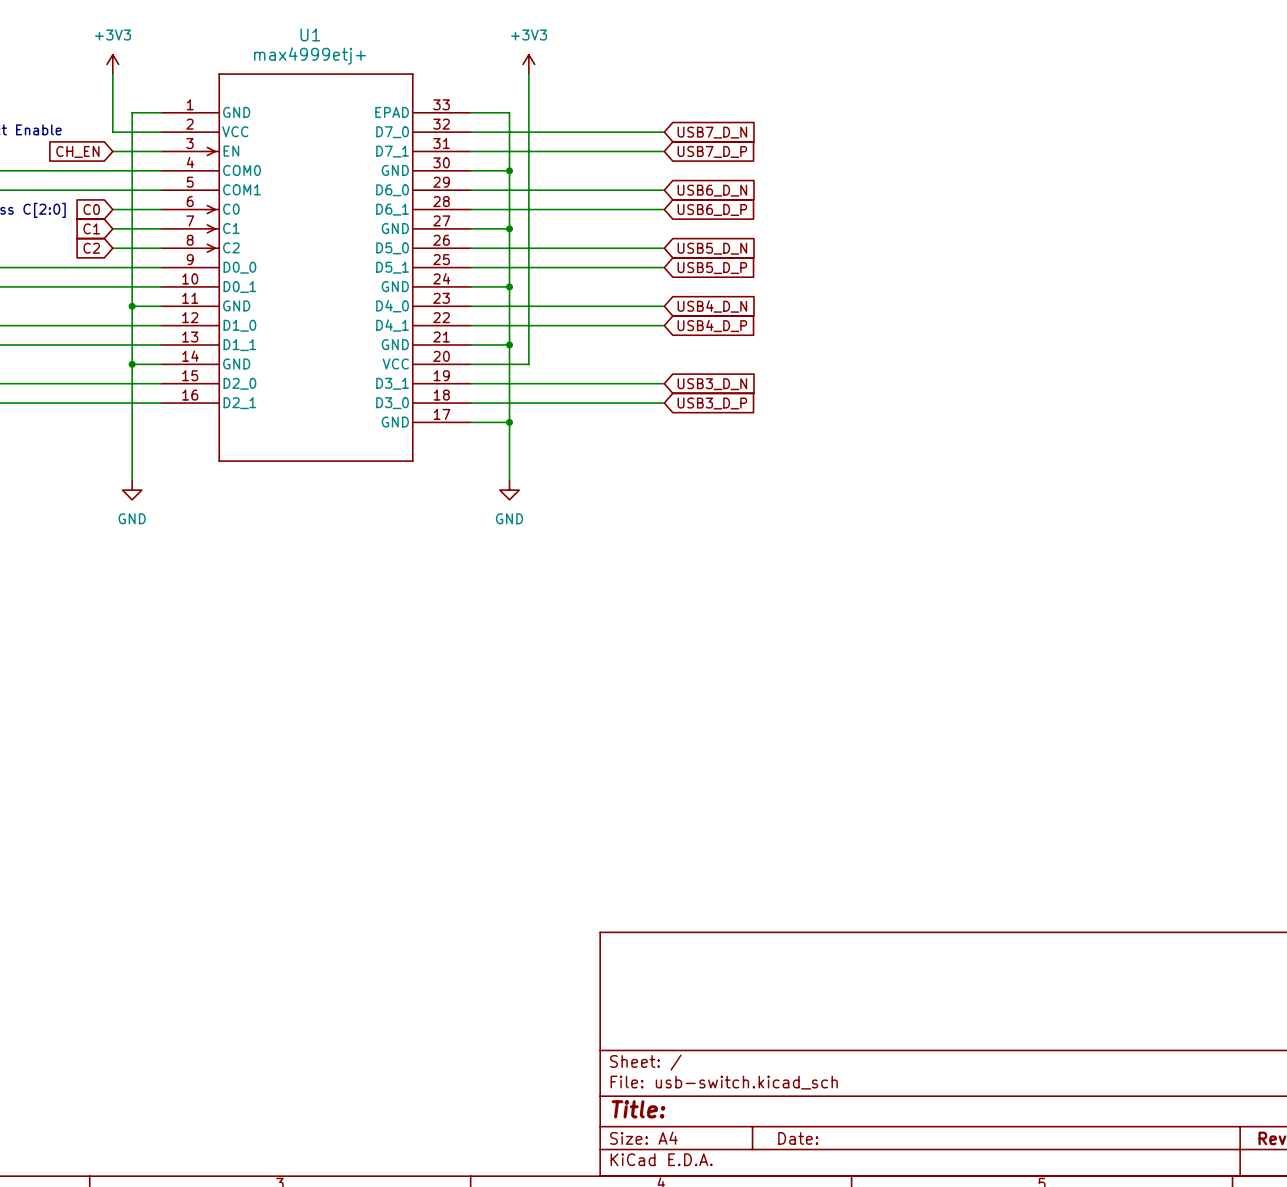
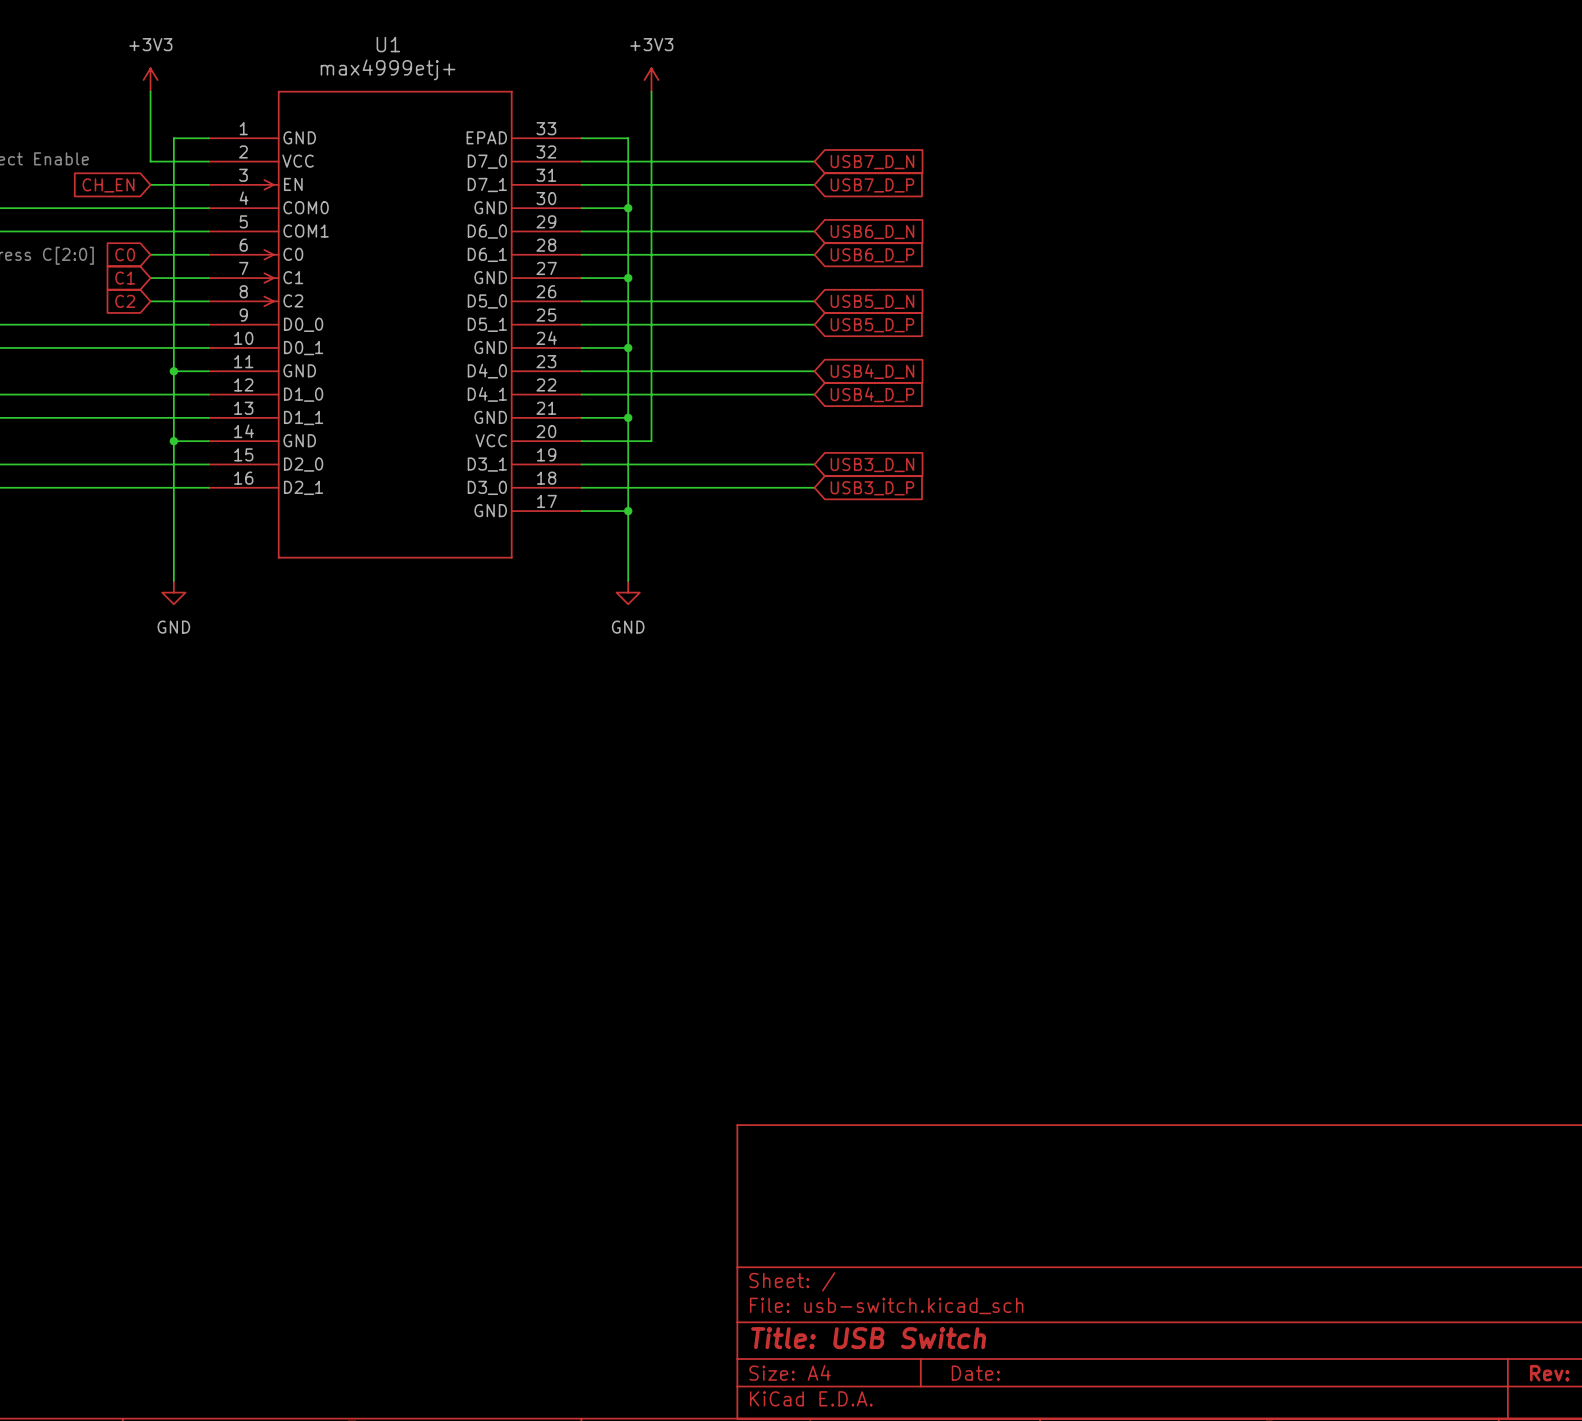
title block: Title: (638, 1109) -> Title: USB Switch (868, 1338)

